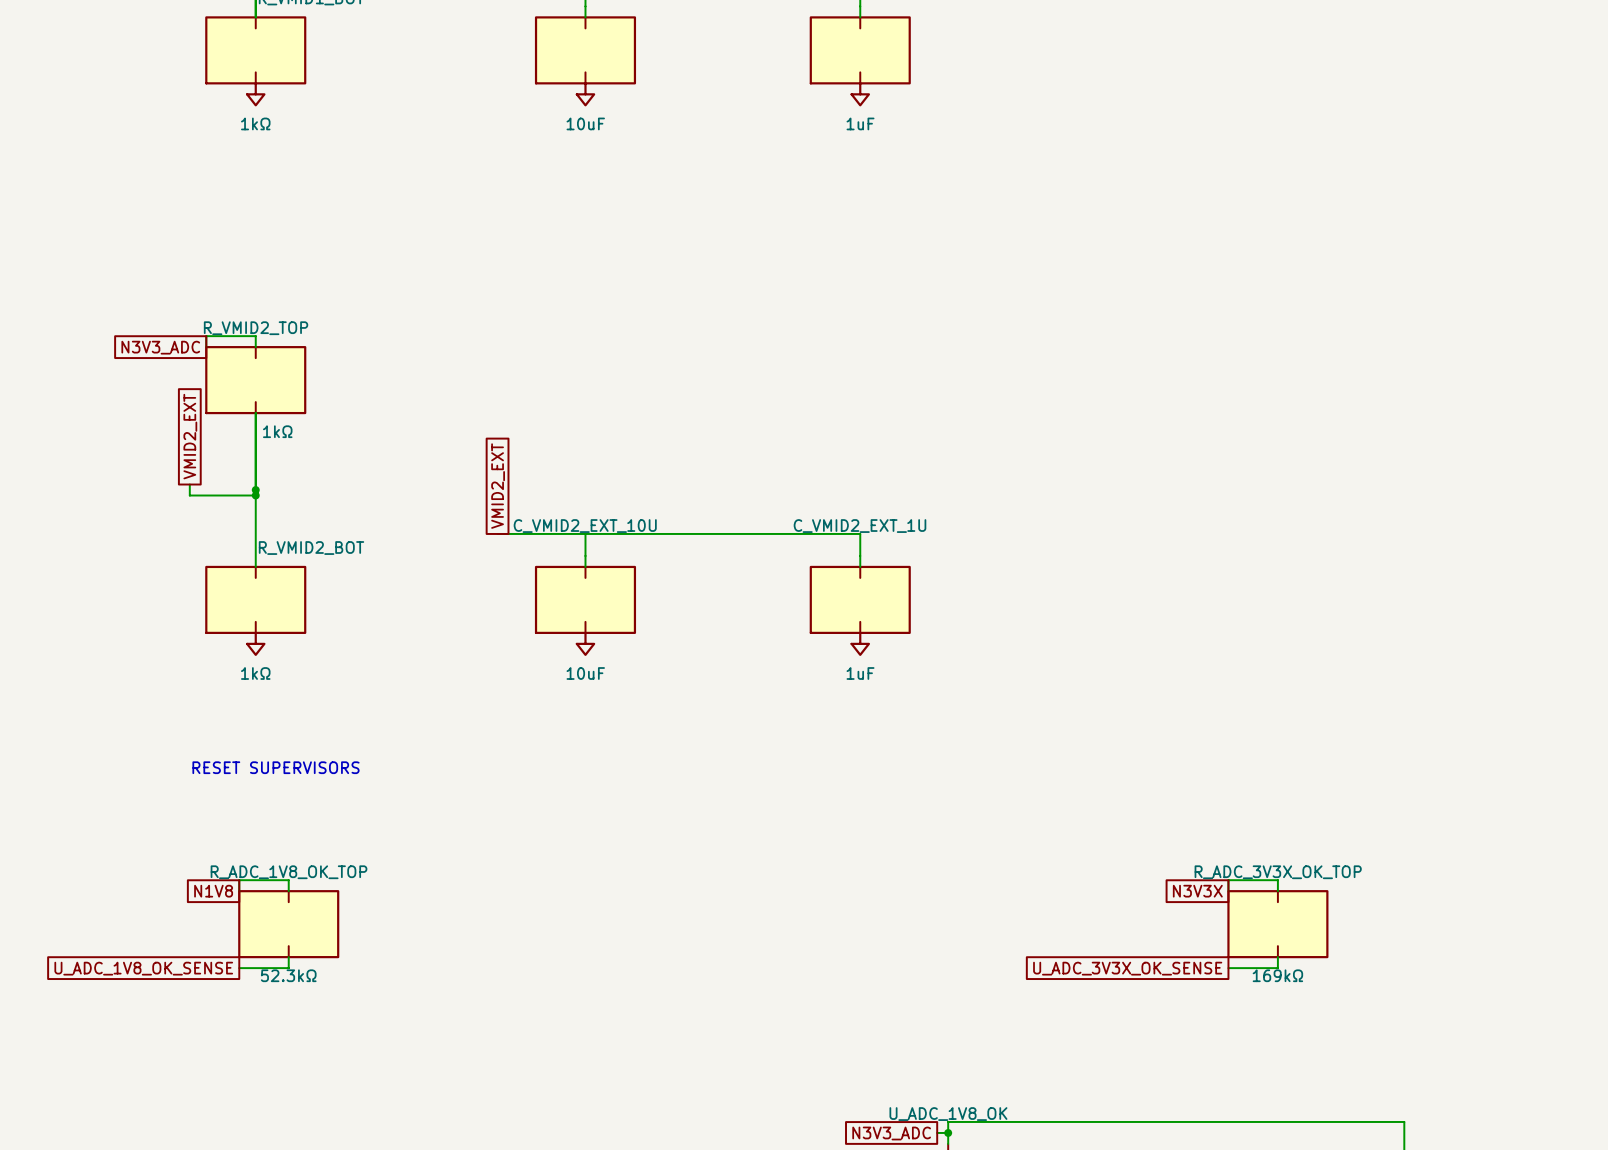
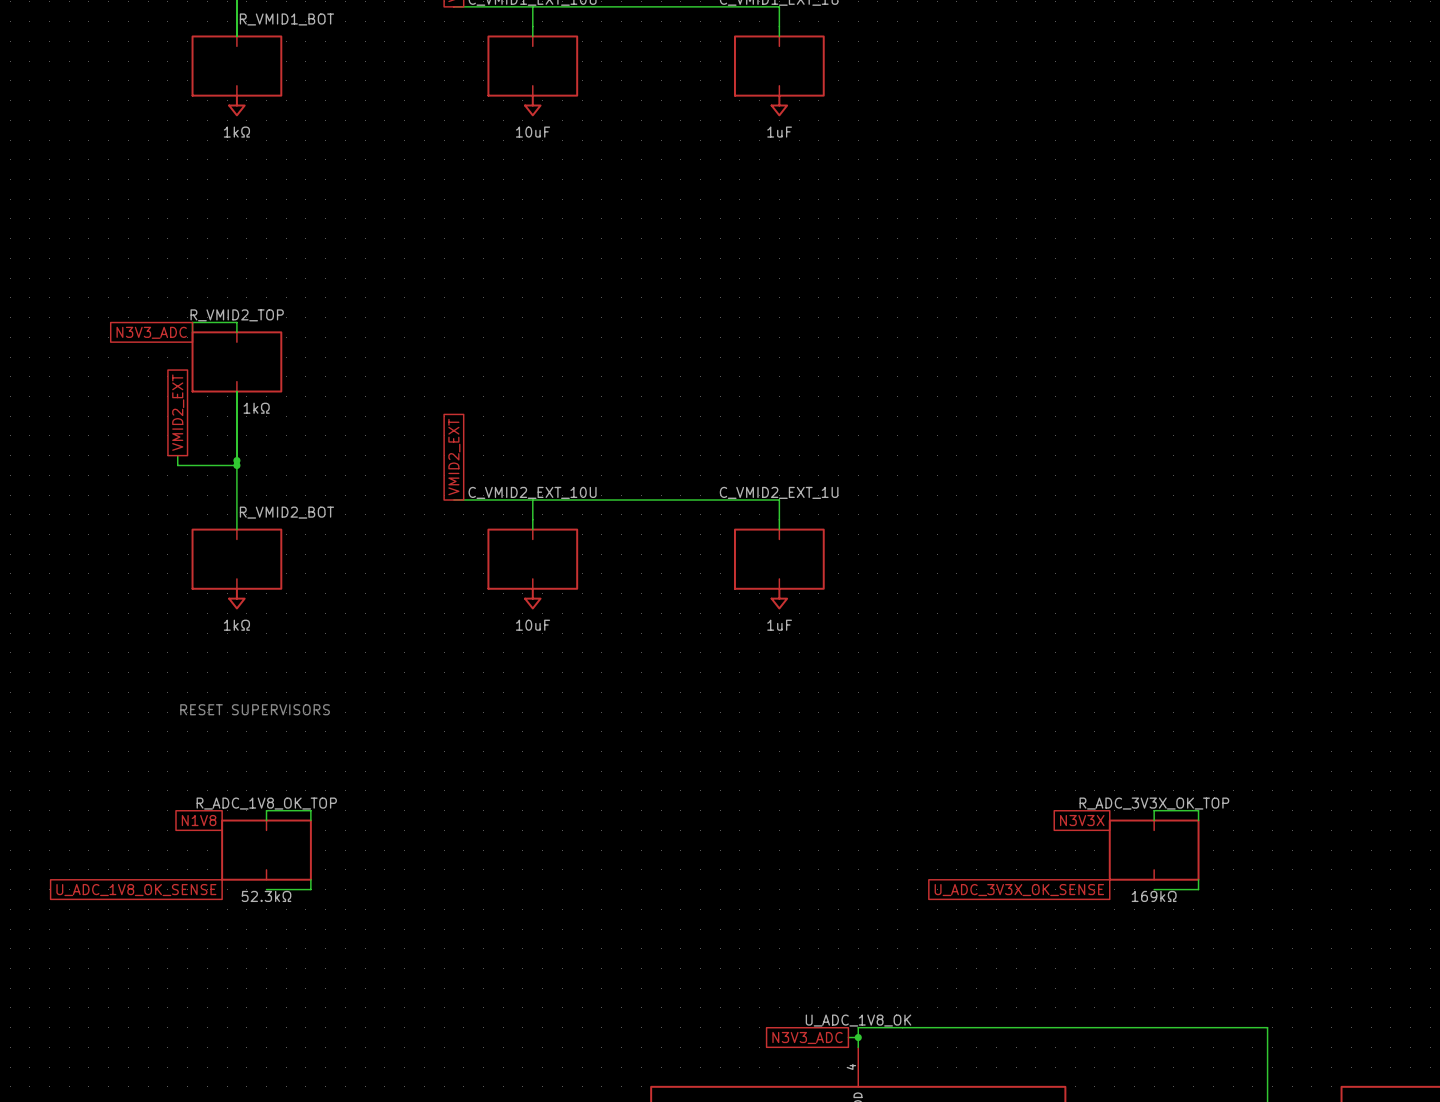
wire: (288, 880) (239, 880) (239, 891) -> (266, 810) (310, 810) (310, 820)
wire: (1277, 880) (1228, 880) (1228, 891) -> (1154, 810) (1198, 810) (1198, 820)
wire: (288, 957) (288, 968) (239, 968) -> (310, 879) (310, 889) (266, 889)
wire: (1277, 957) (1277, 968) (1228, 968) -> (1198, 879) (1198, 889) (1154, 889)

